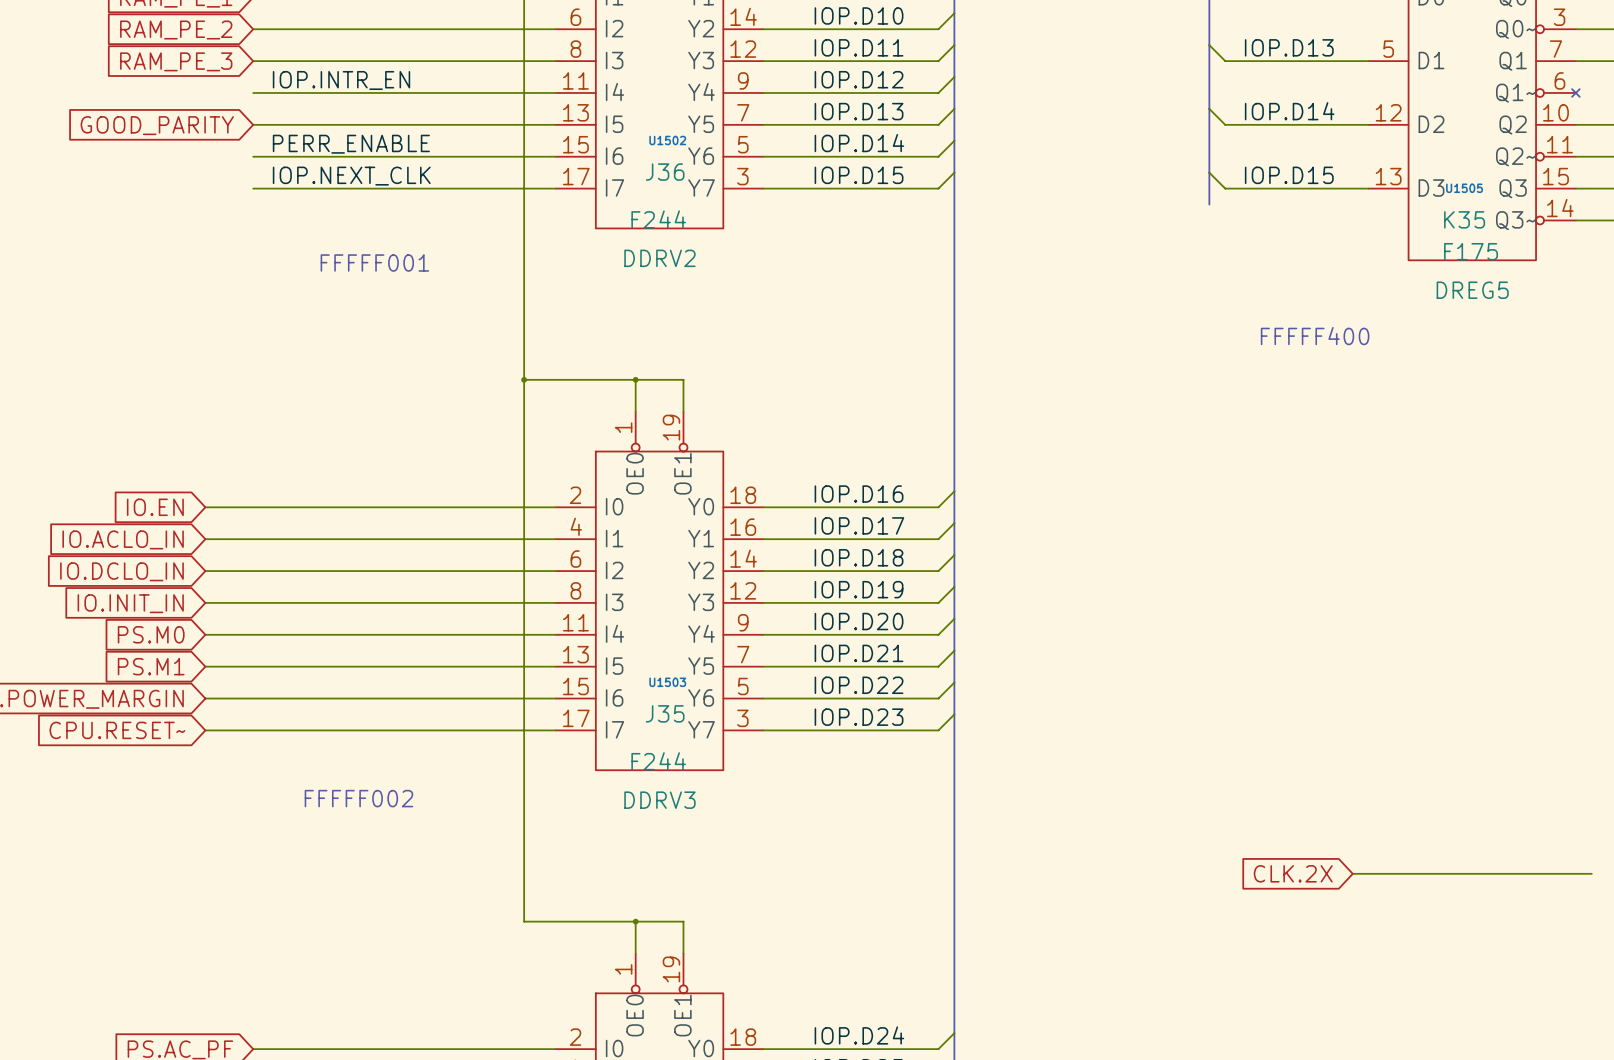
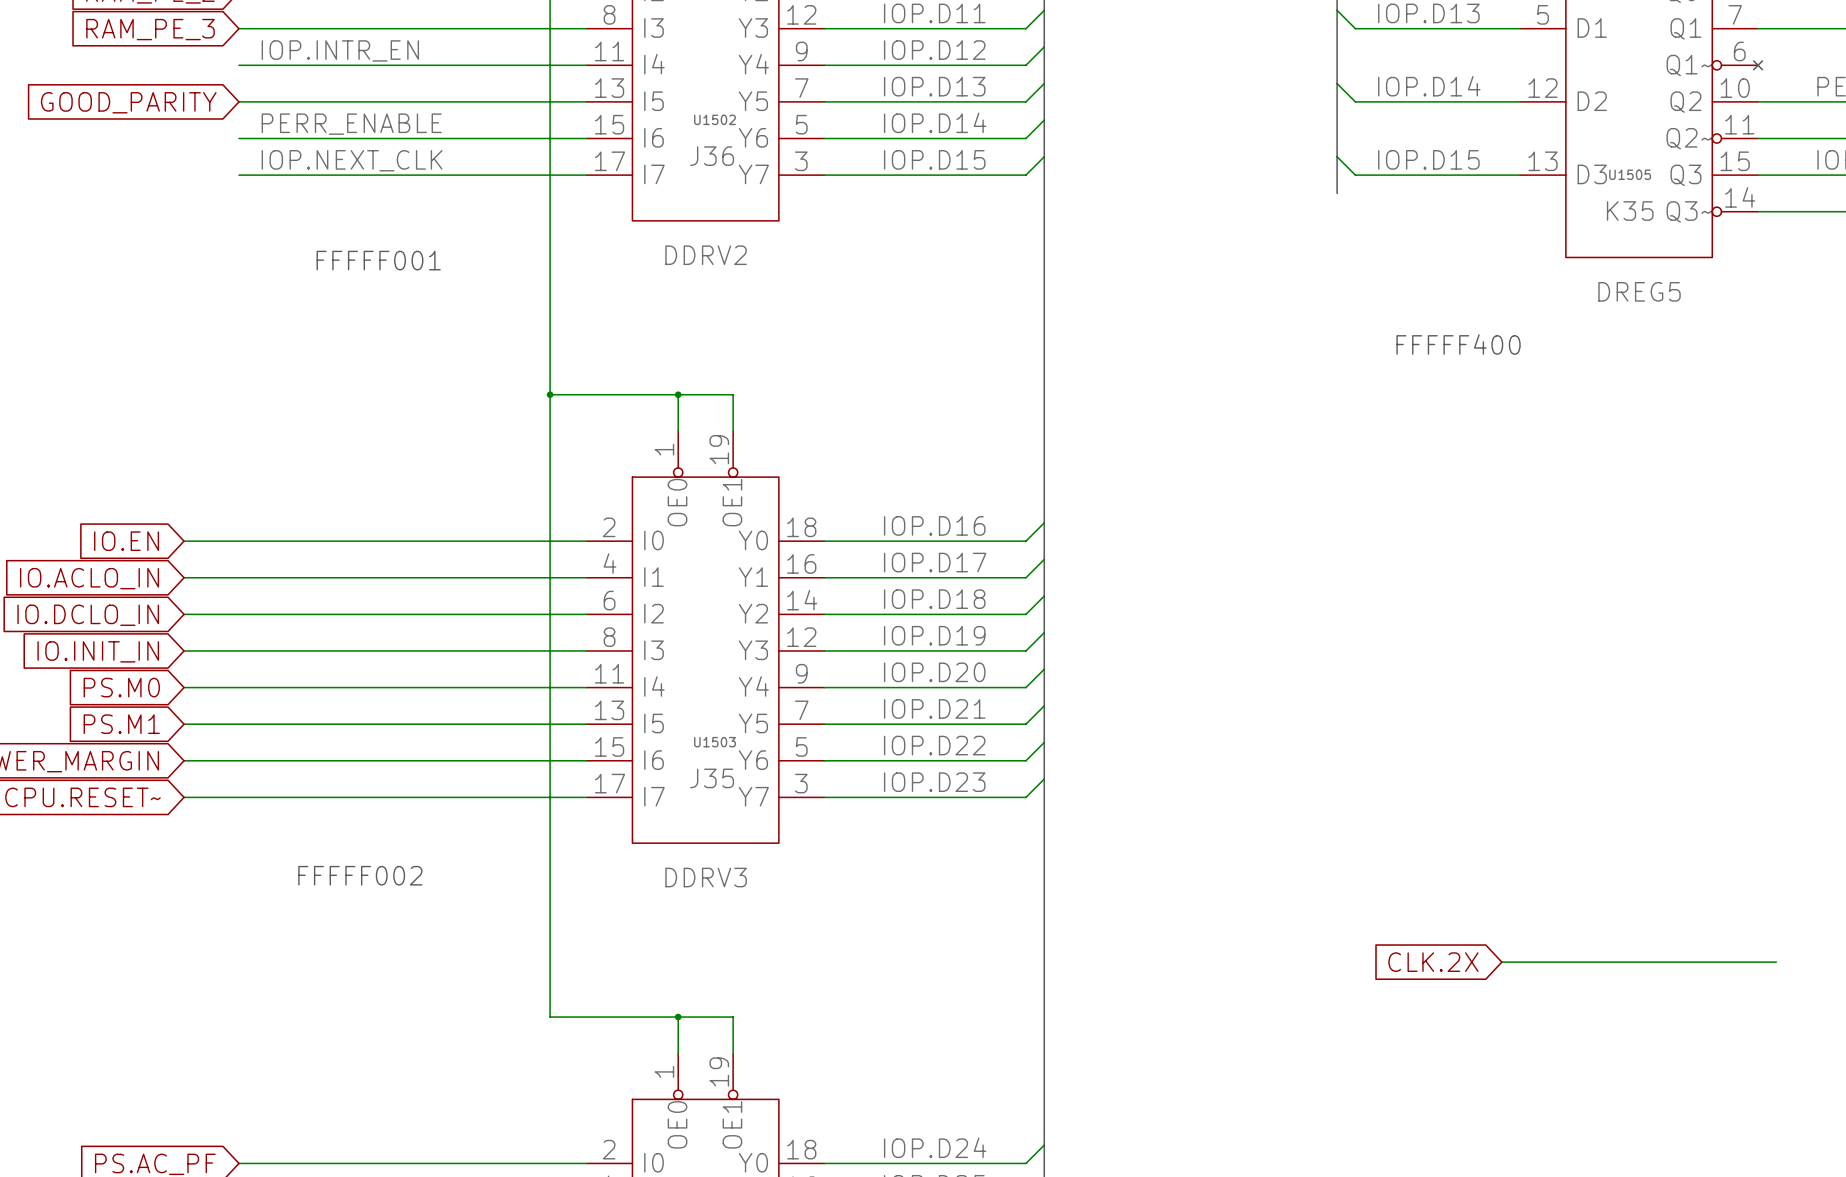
U1502 value: F244 (658, 219) -> none
U1505 value: F175 (1471, 251) -> none
U1503 value: F244 (658, 761) -> none

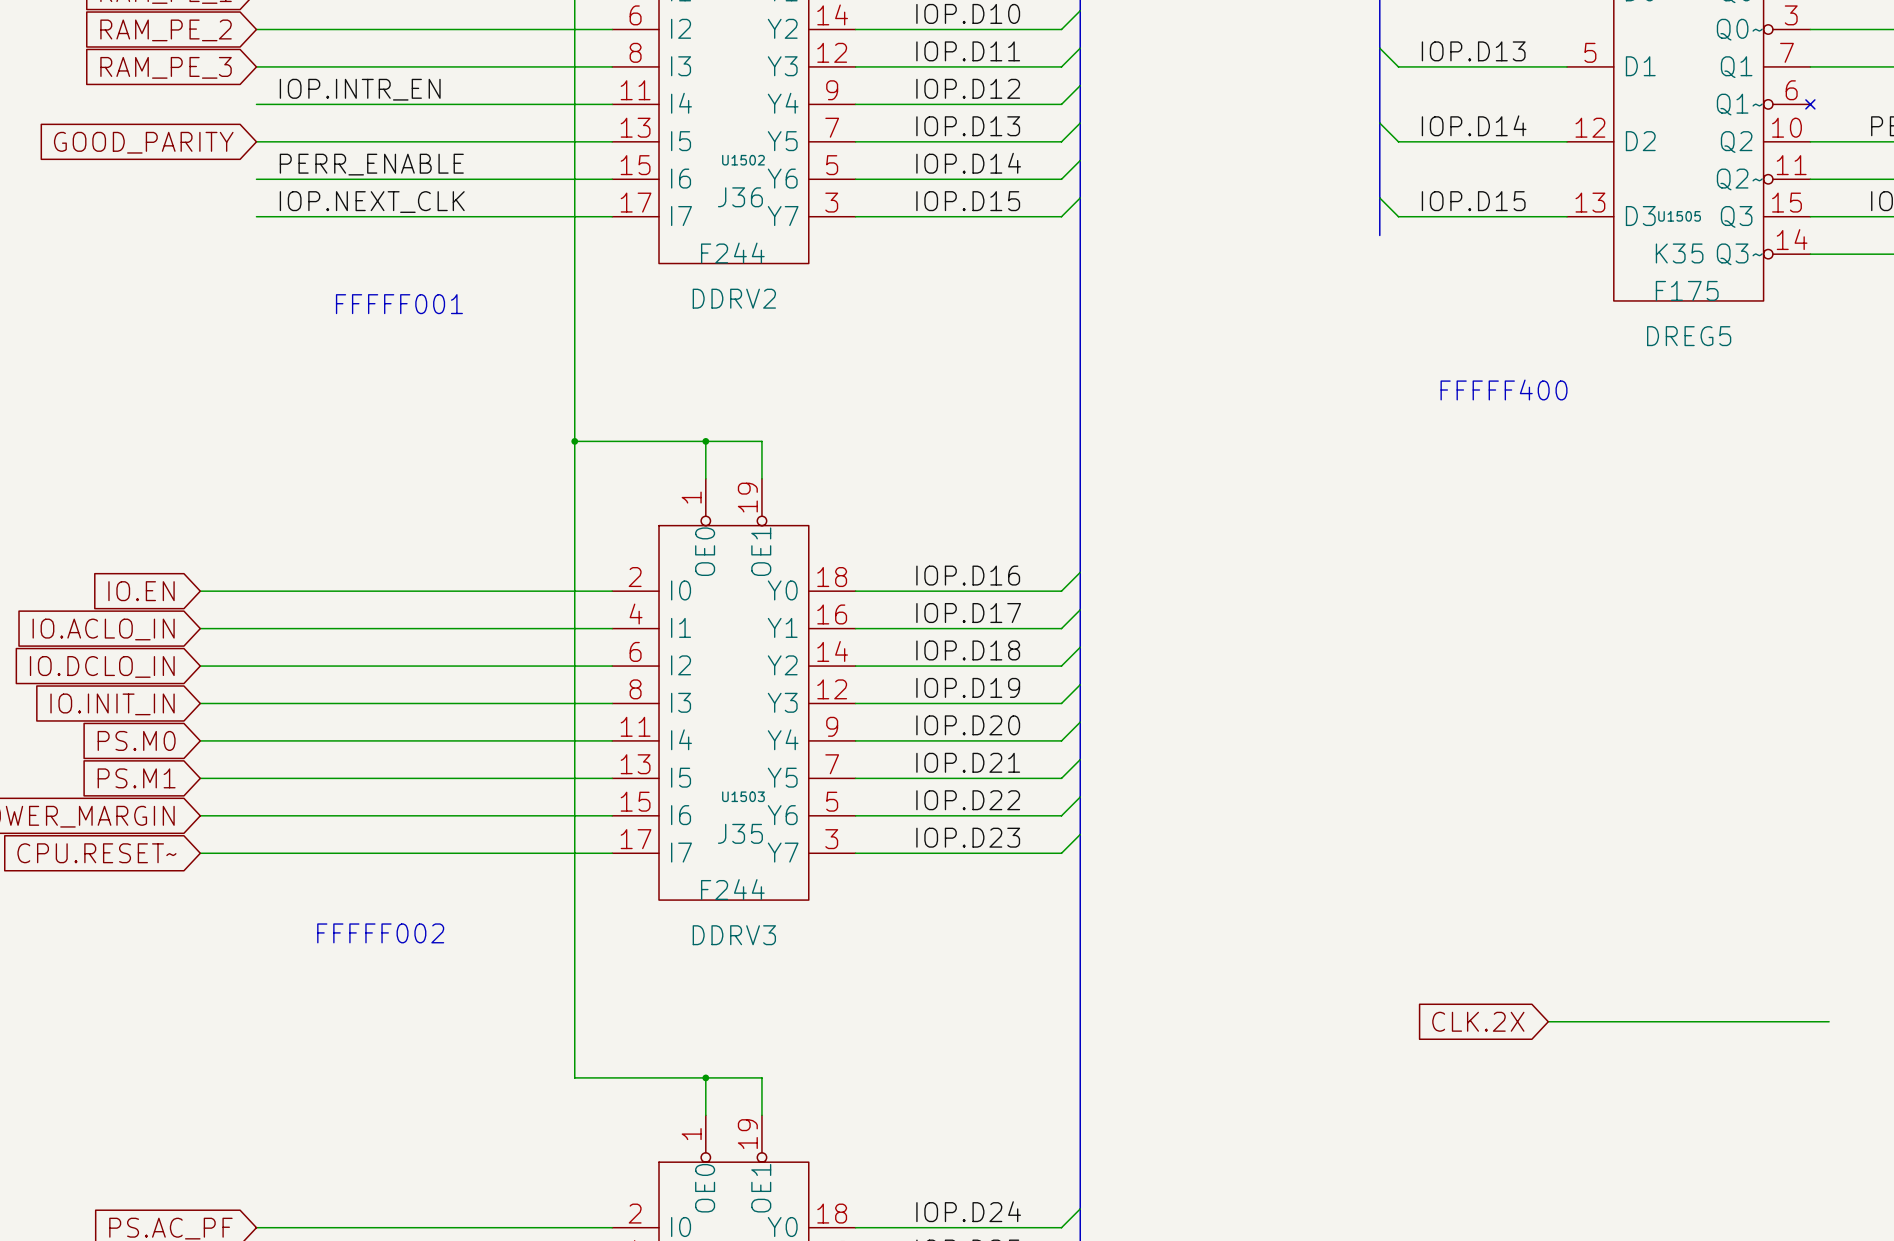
U1502 value: none -> F244 (732, 253)
U1505 value: none -> F175 (1687, 290)
U1503 value: none -> F244 (732, 889)

